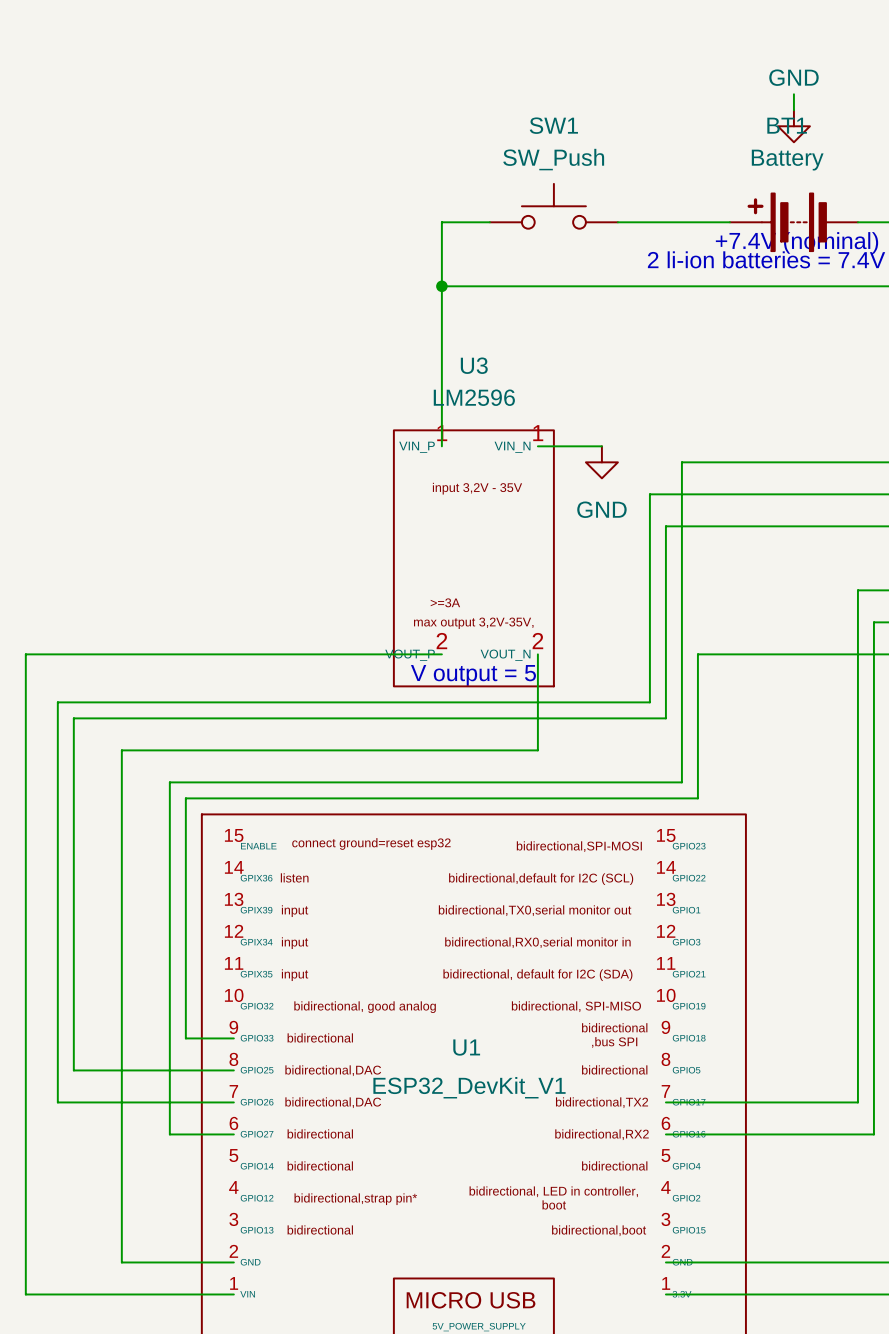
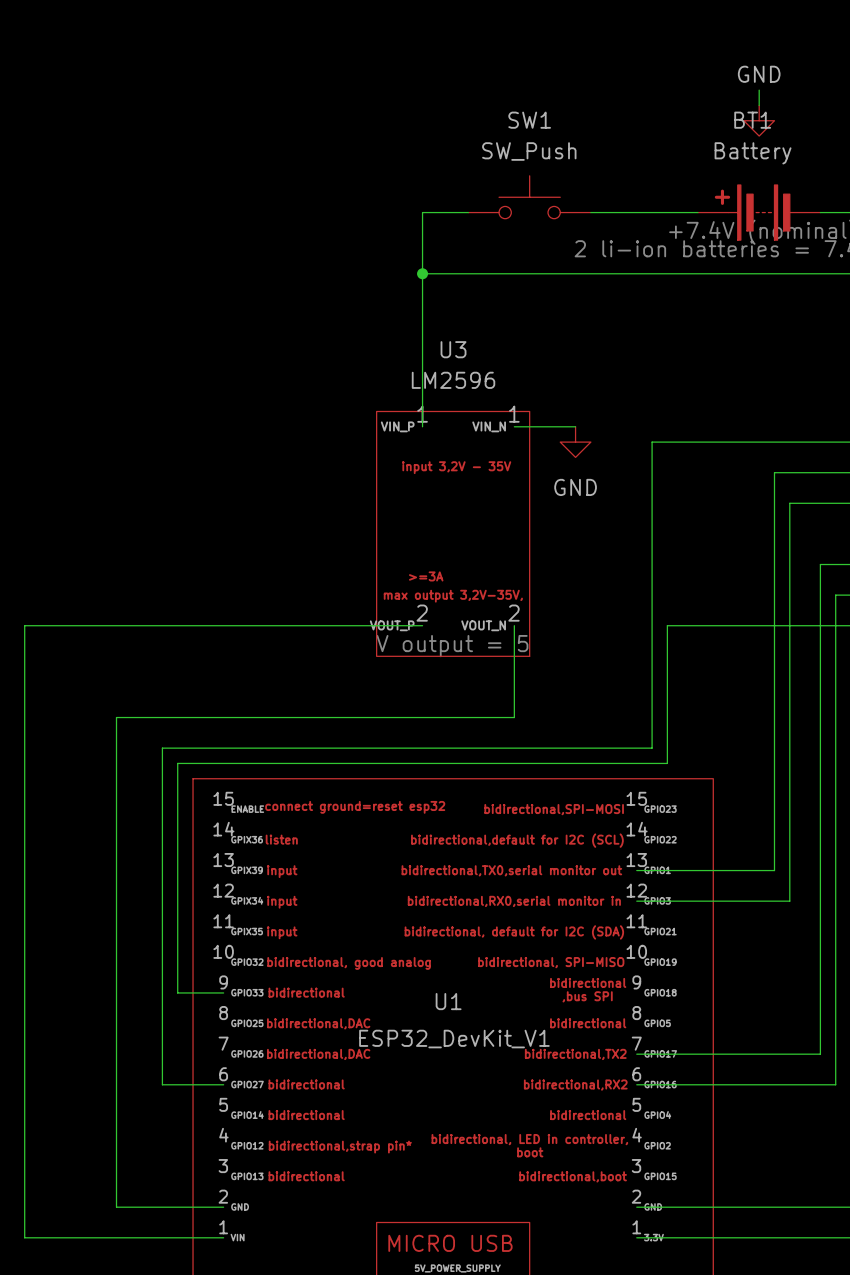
wire: (809, 494) (649, 494) (649, 702) (57, 702) (57, 1102) (233, 1102) -> (774, 472) (774, 870) (636, 870)
wire: (825, 526) (665, 526) (665, 718) (73, 718) (73, 1070) (233, 1070) -> (789, 503) (789, 901) (636, 901)

